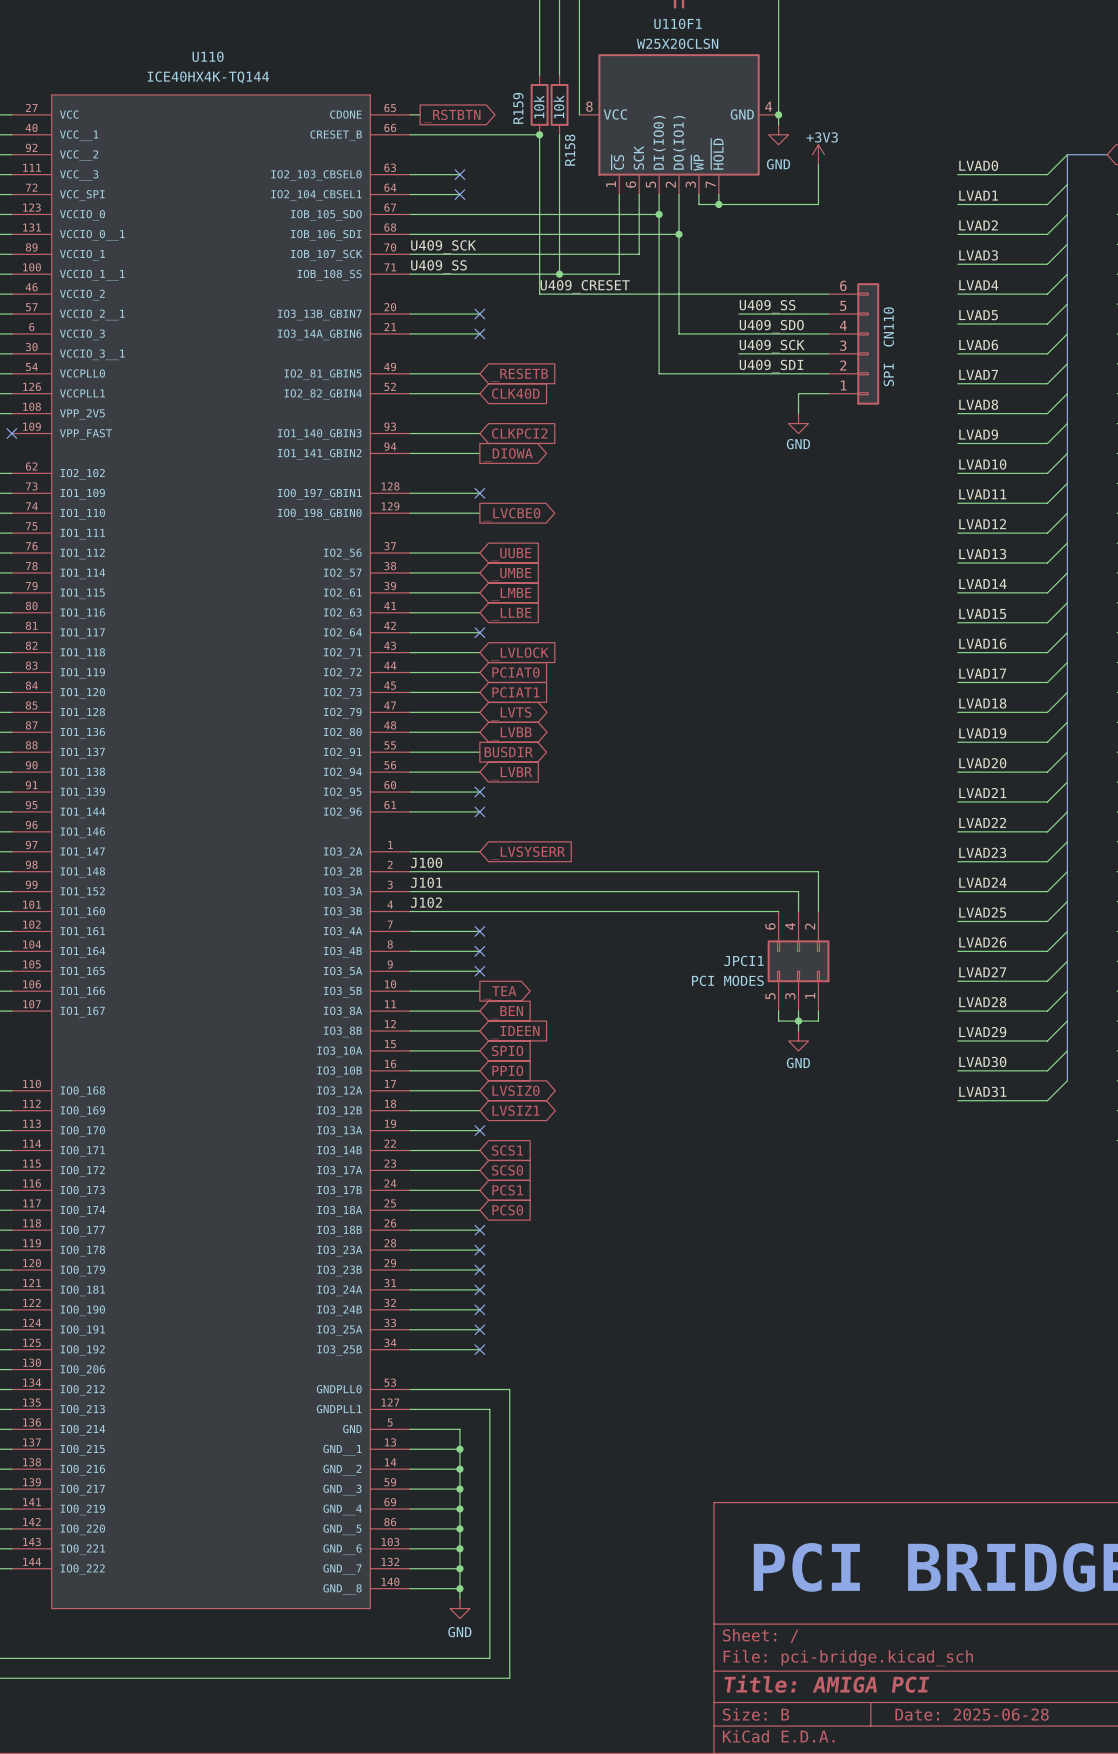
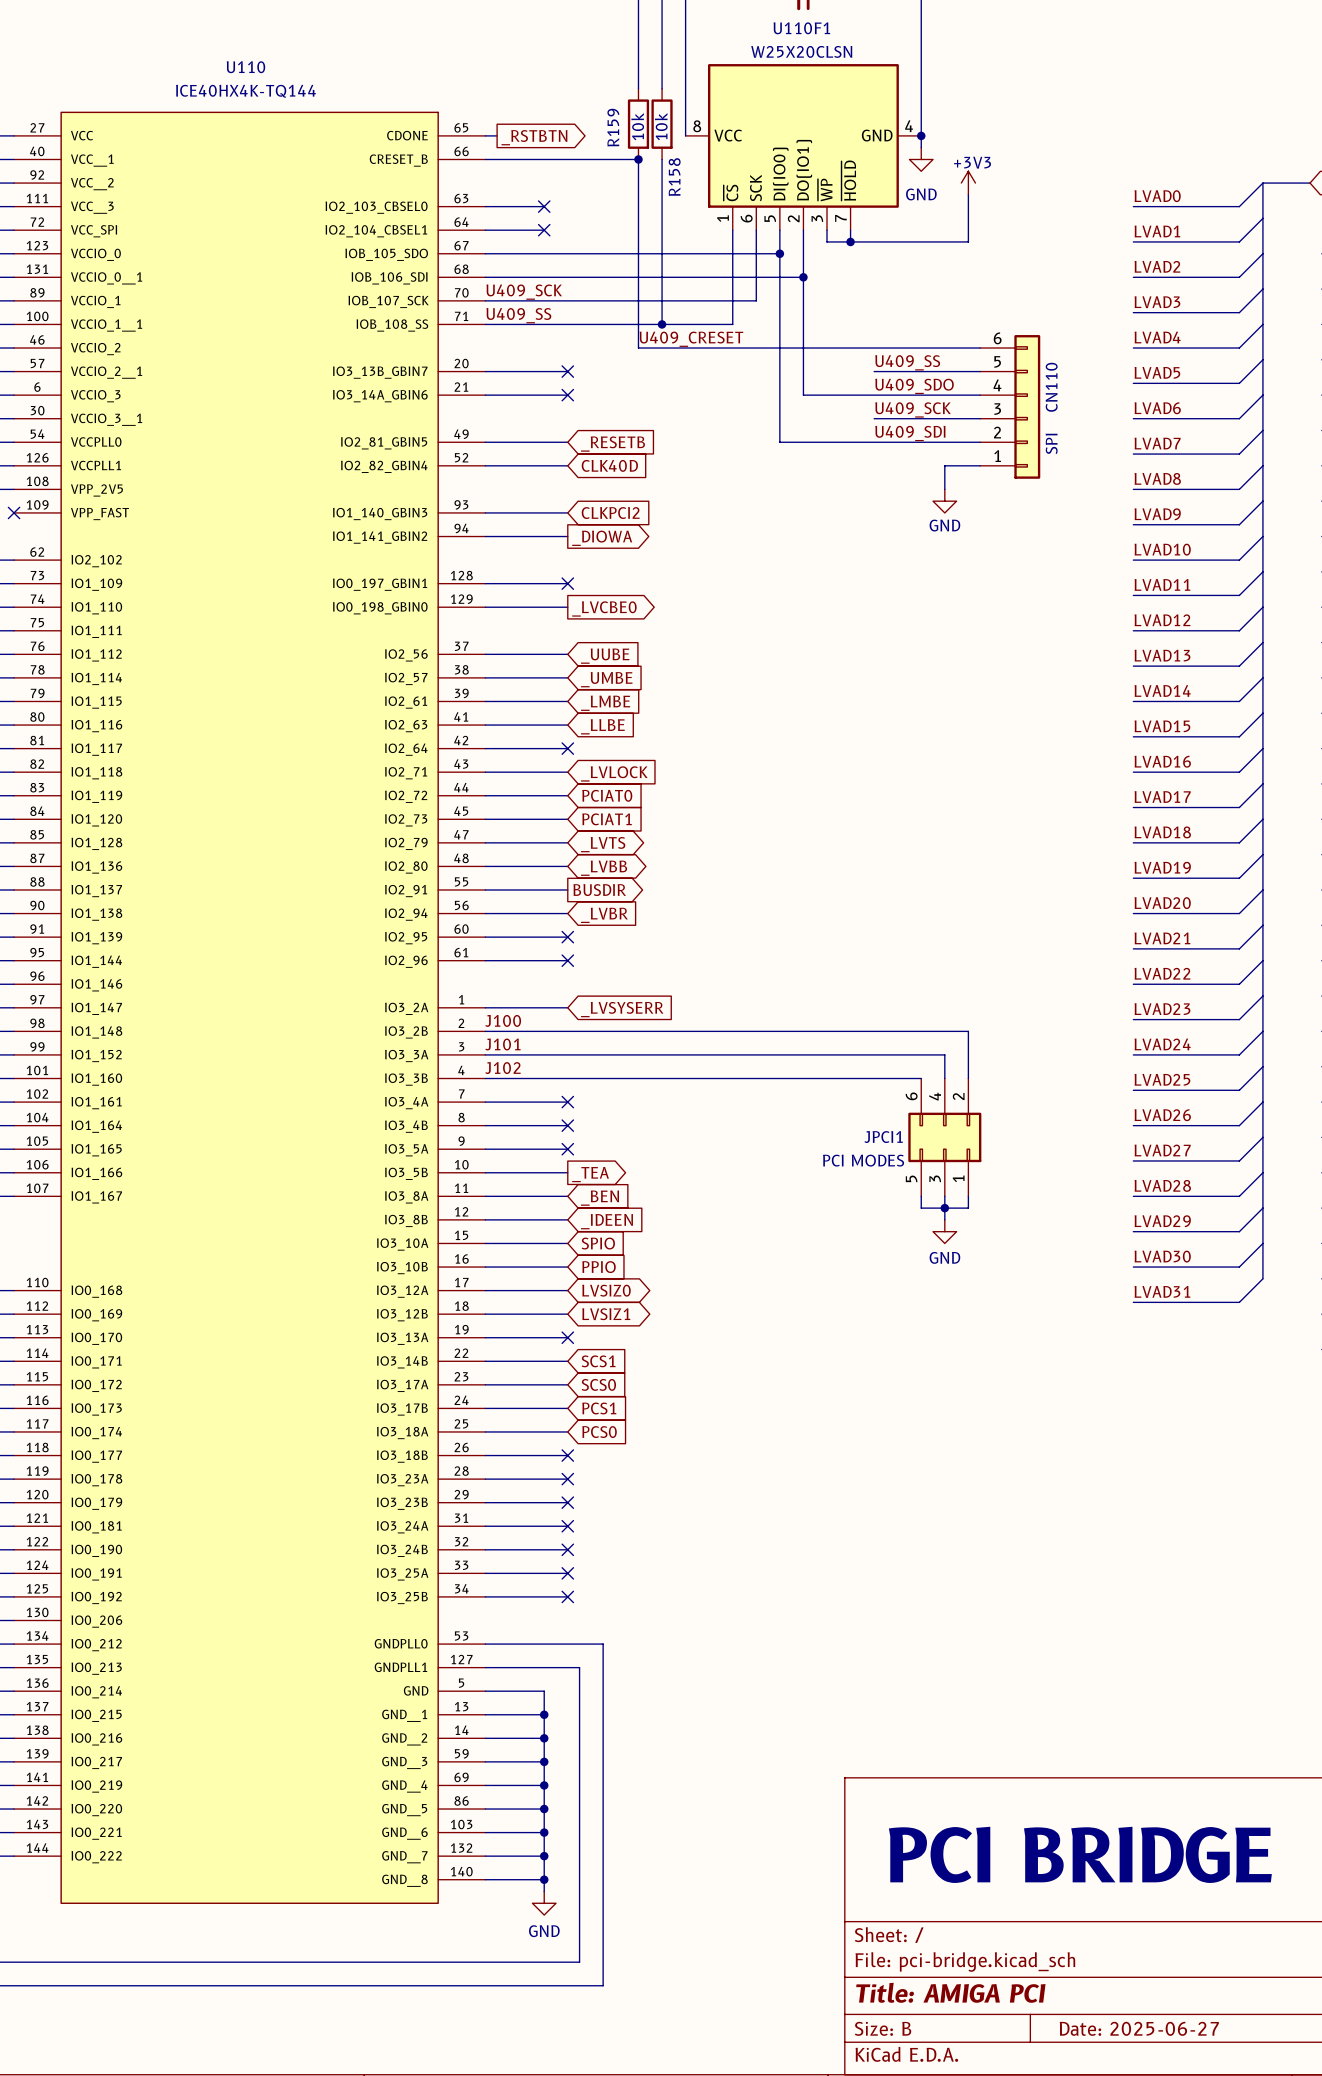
title block: Date: 2025-06-28 (972, 1714) -> Date: 2025-06-27 (1139, 2028)

